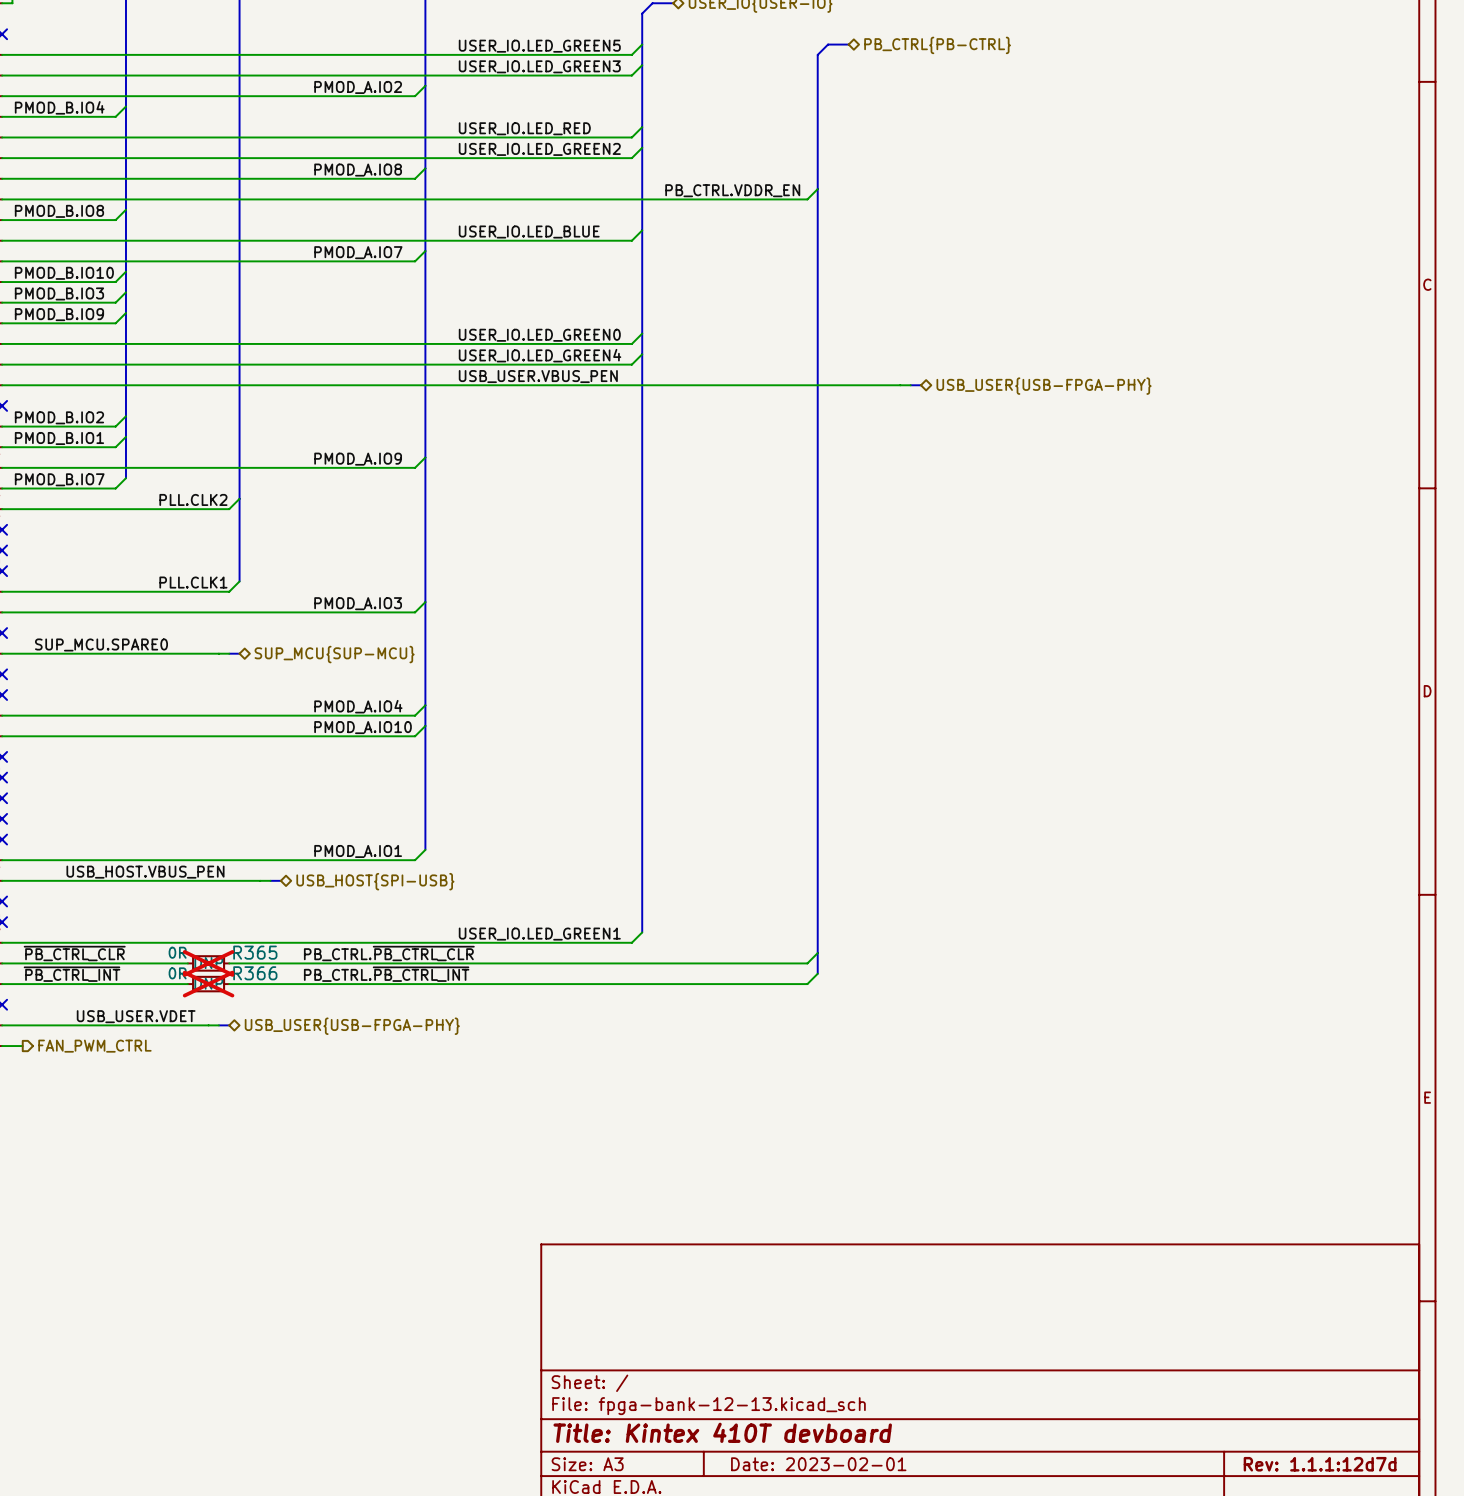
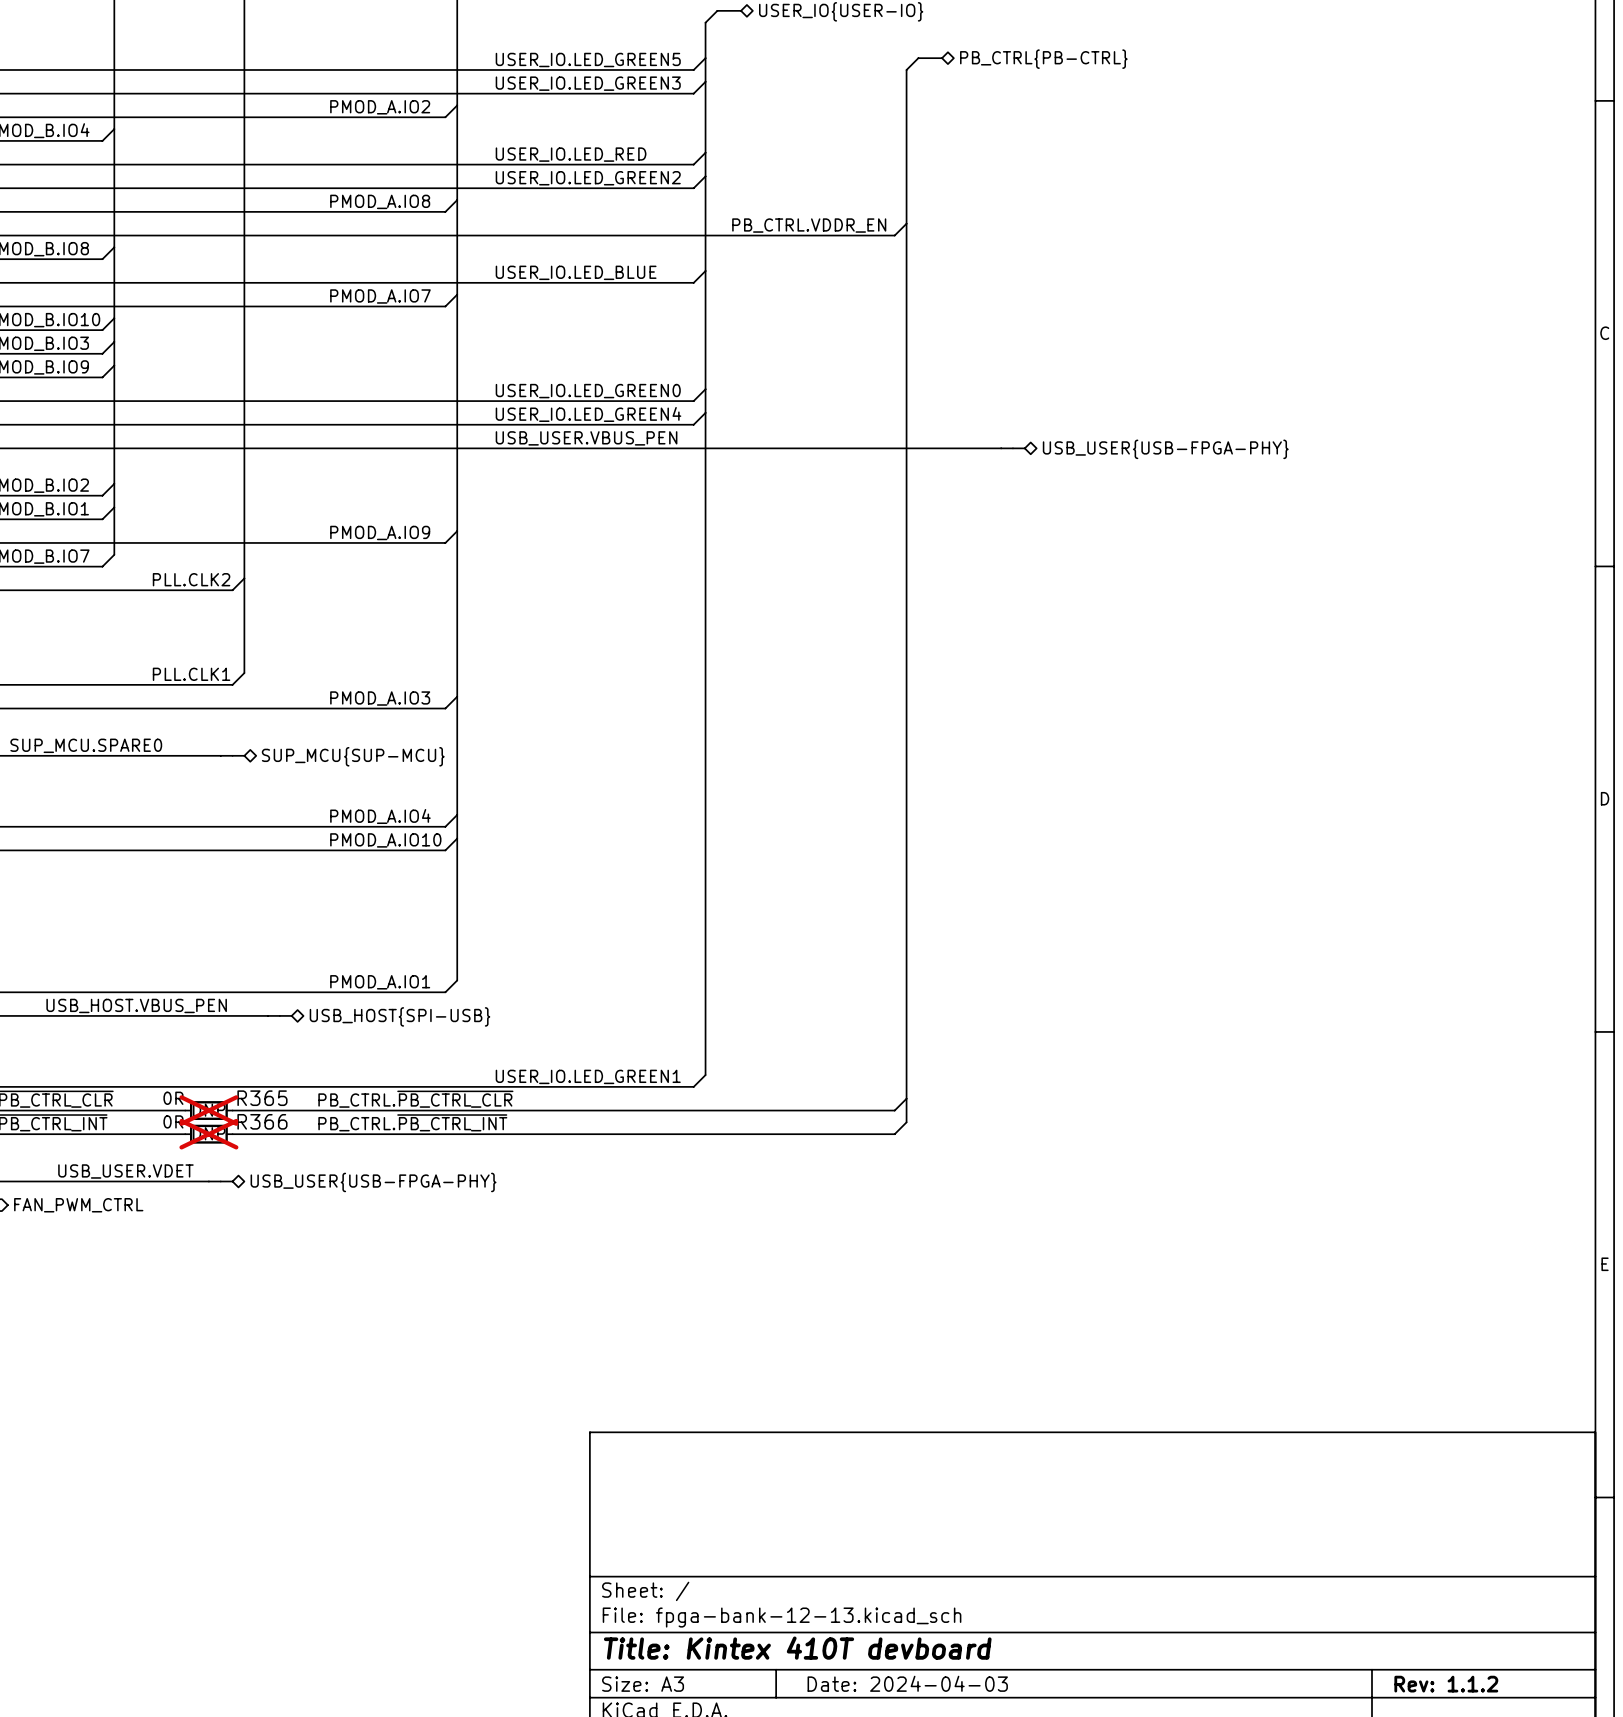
title block: Date: 2023-02-01 (818, 1464) -> Date: 2024-04-03 (907, 1683)
title block: Rev: 1.1.1:12d7d (1320, 1464) -> Rev: 1.1.2 (1446, 1684)

